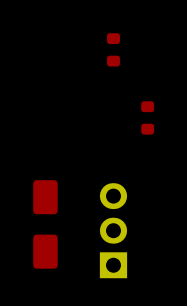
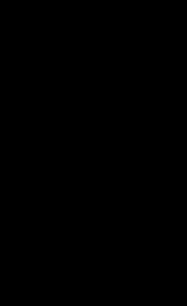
part: (113, 49) -> none
part: (147, 117) -> none
part: (45, 224) -> none
part: (113, 230) -> none

